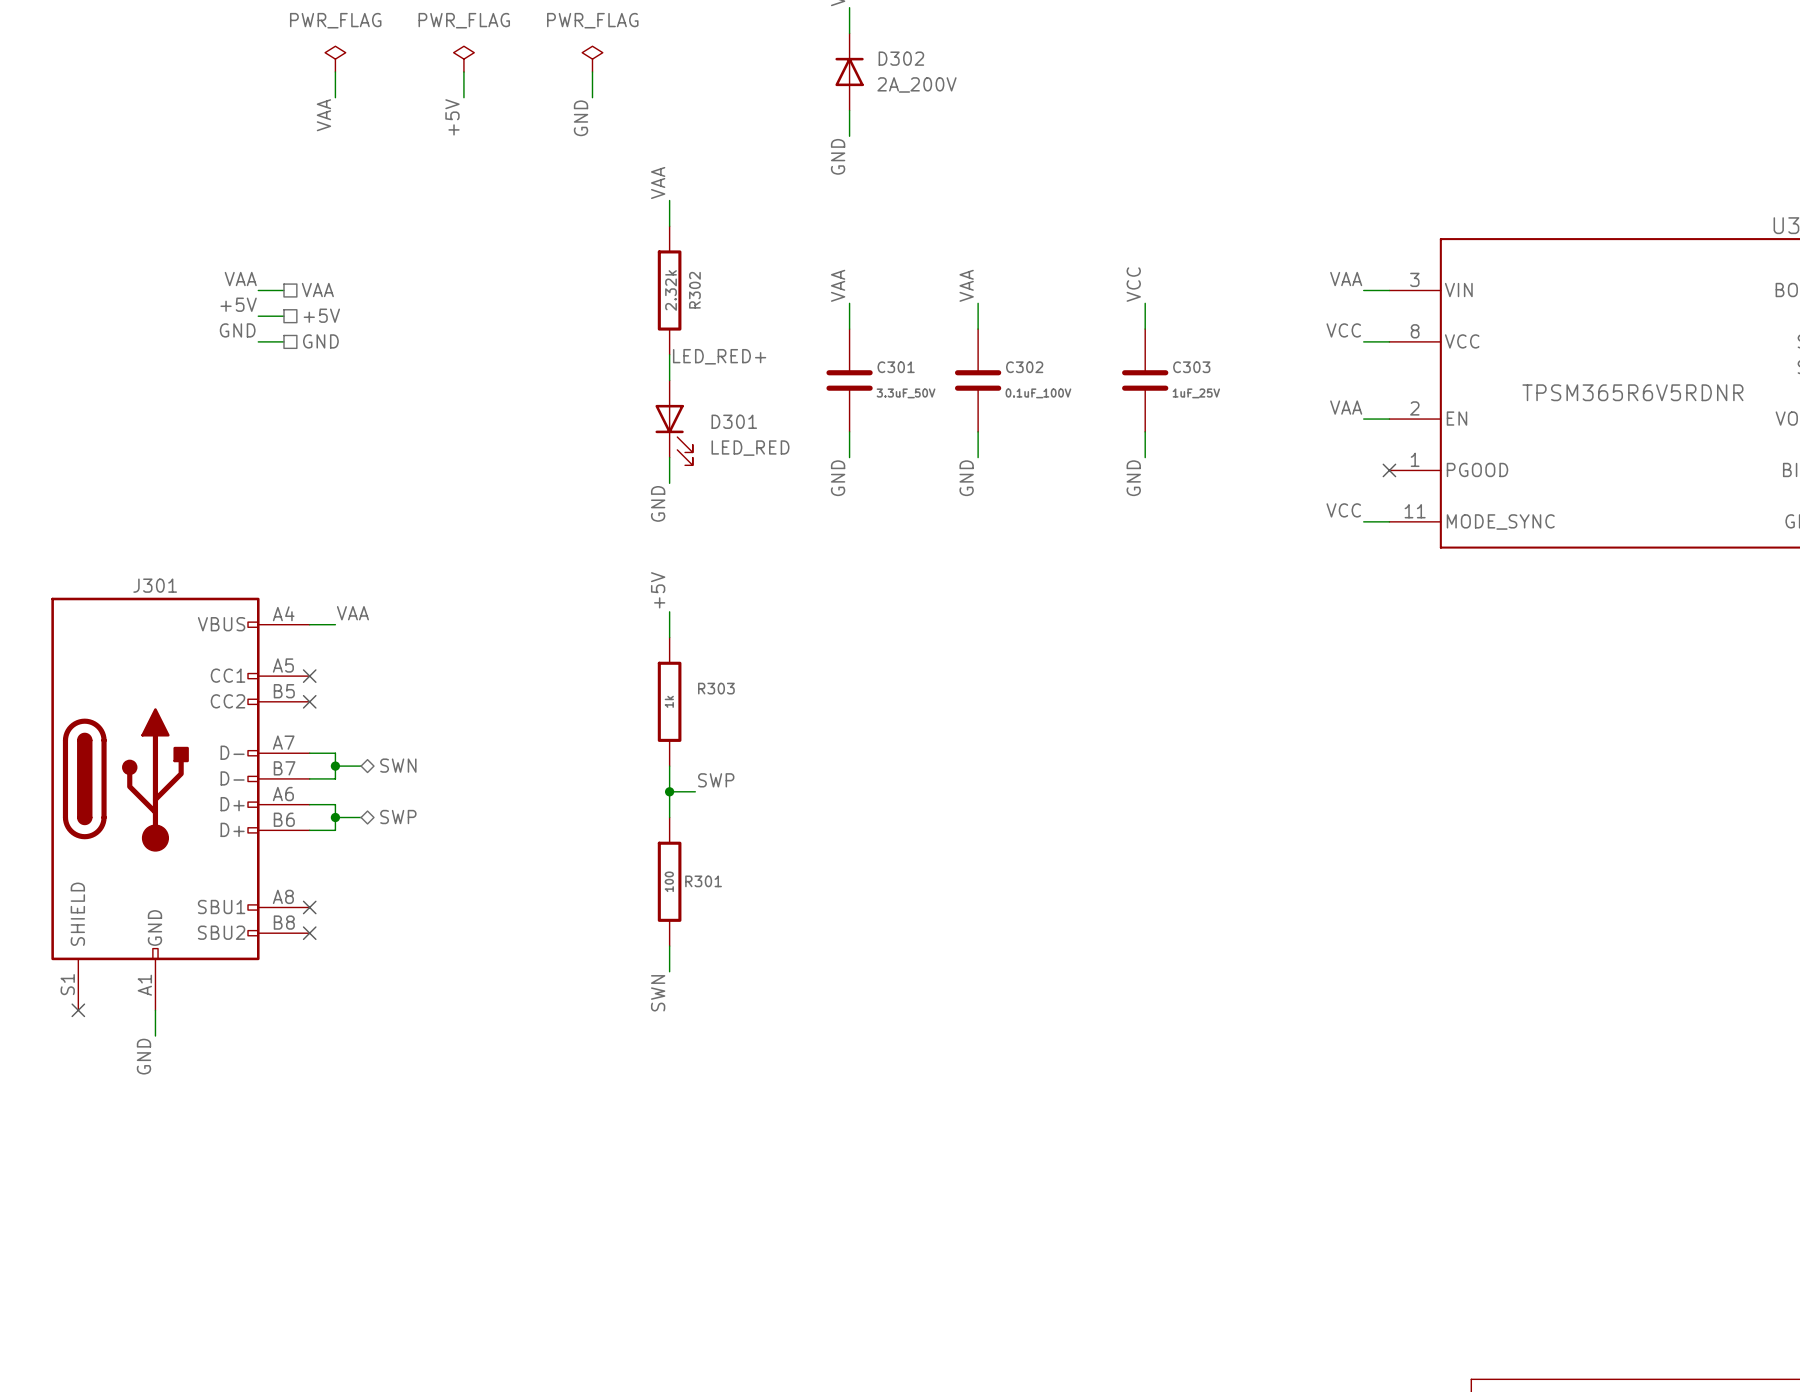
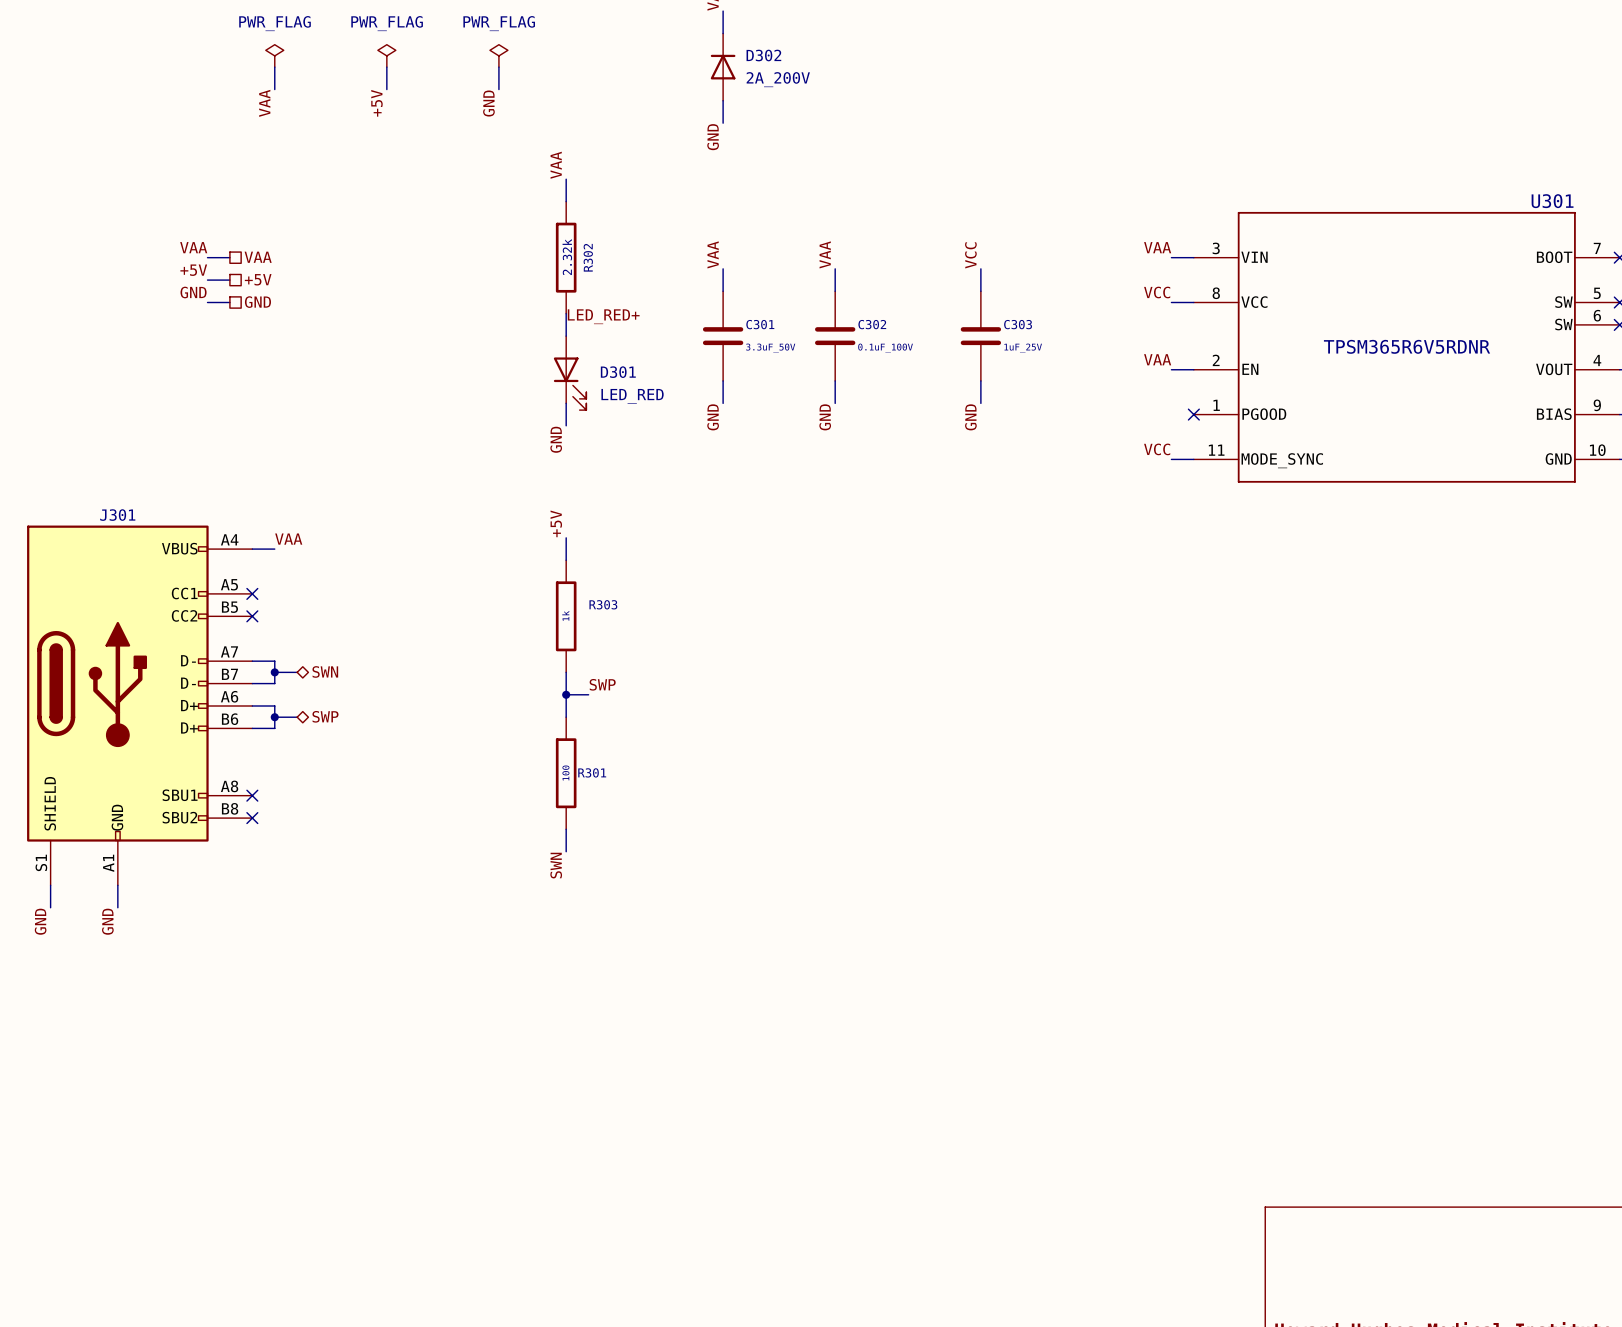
wire: none -> (50, 885) (50, 907)
no-connect mark: (78, 1010) -> none
label: none -> GND (40, 921)

